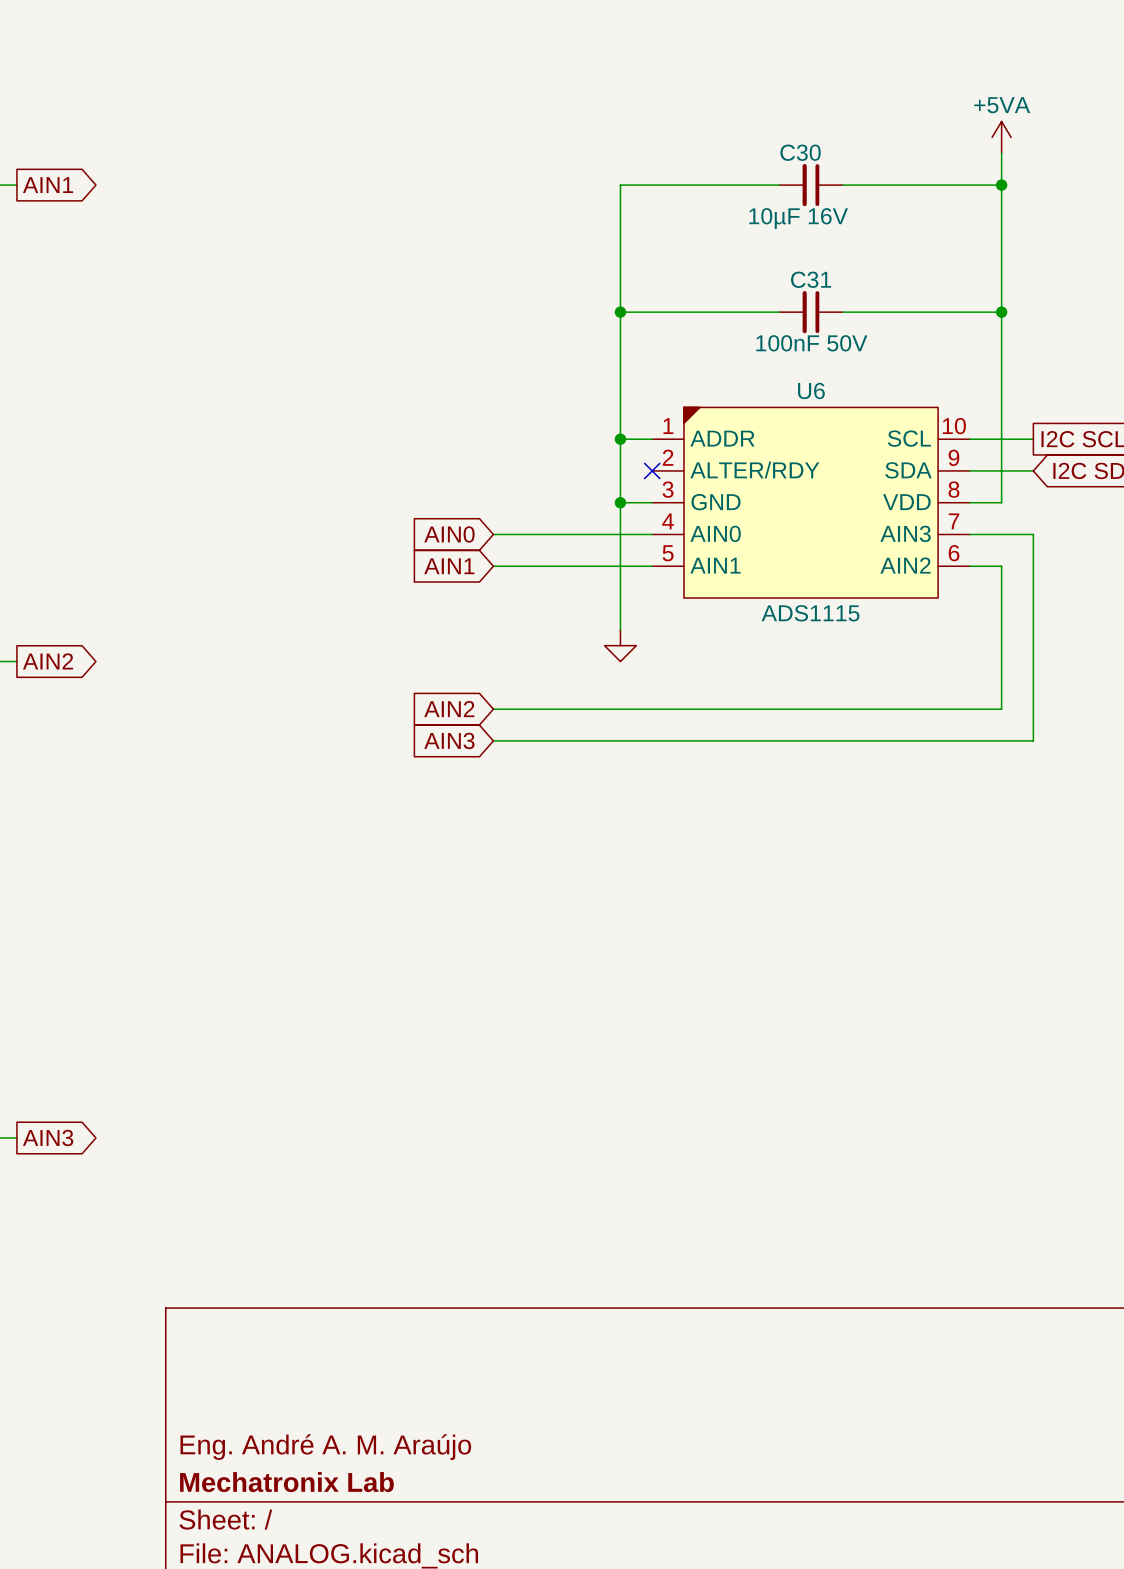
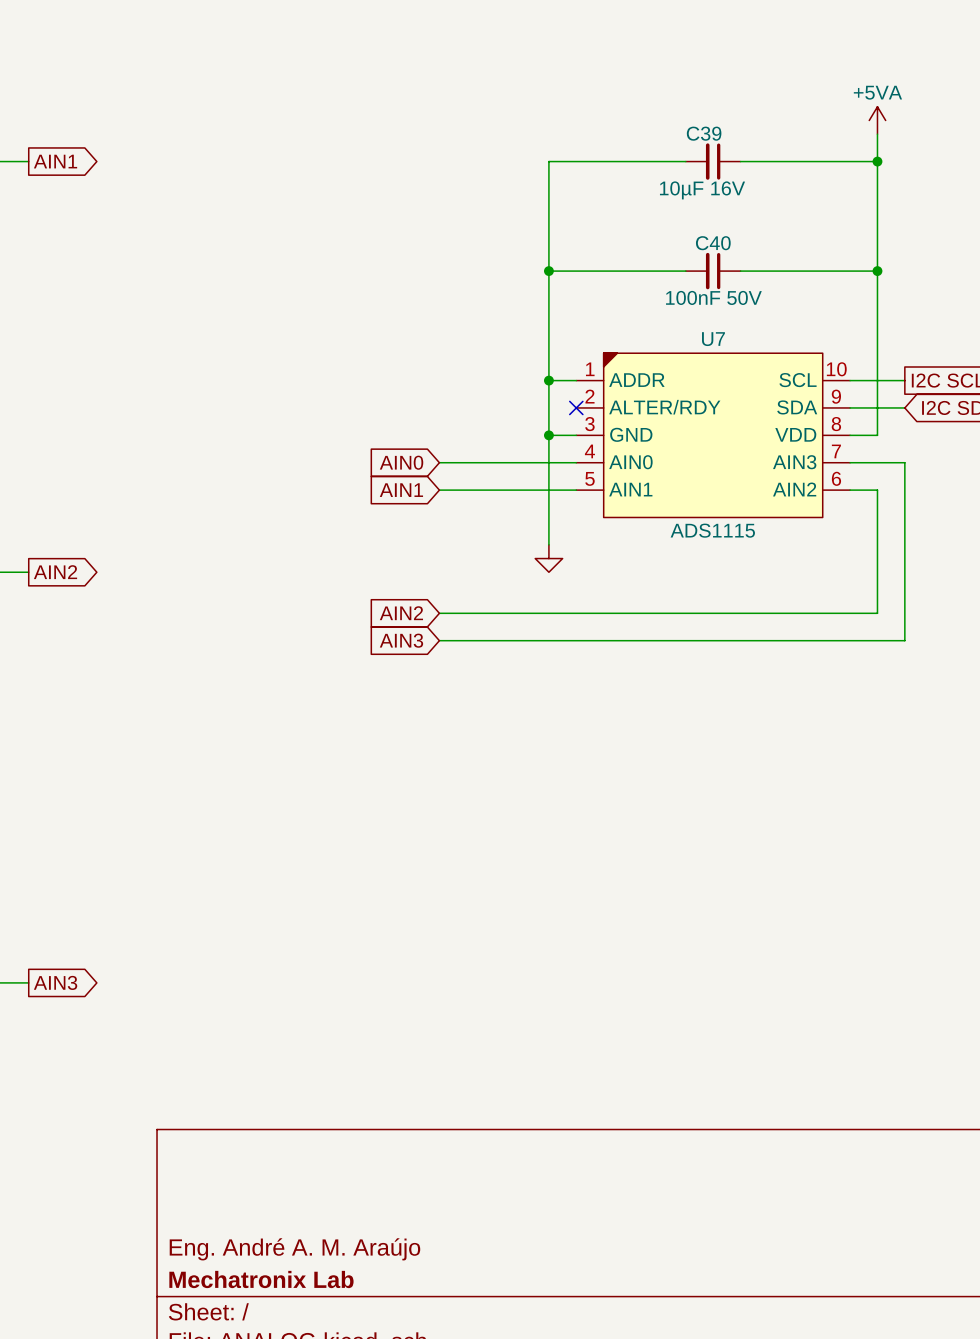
C30 name: C30 (800, 152) -> C39 (704, 133)
C31 name: C31 (811, 279) -> C40 (713, 243)
U6 name: U6 (811, 390) -> U7 (713, 339)

